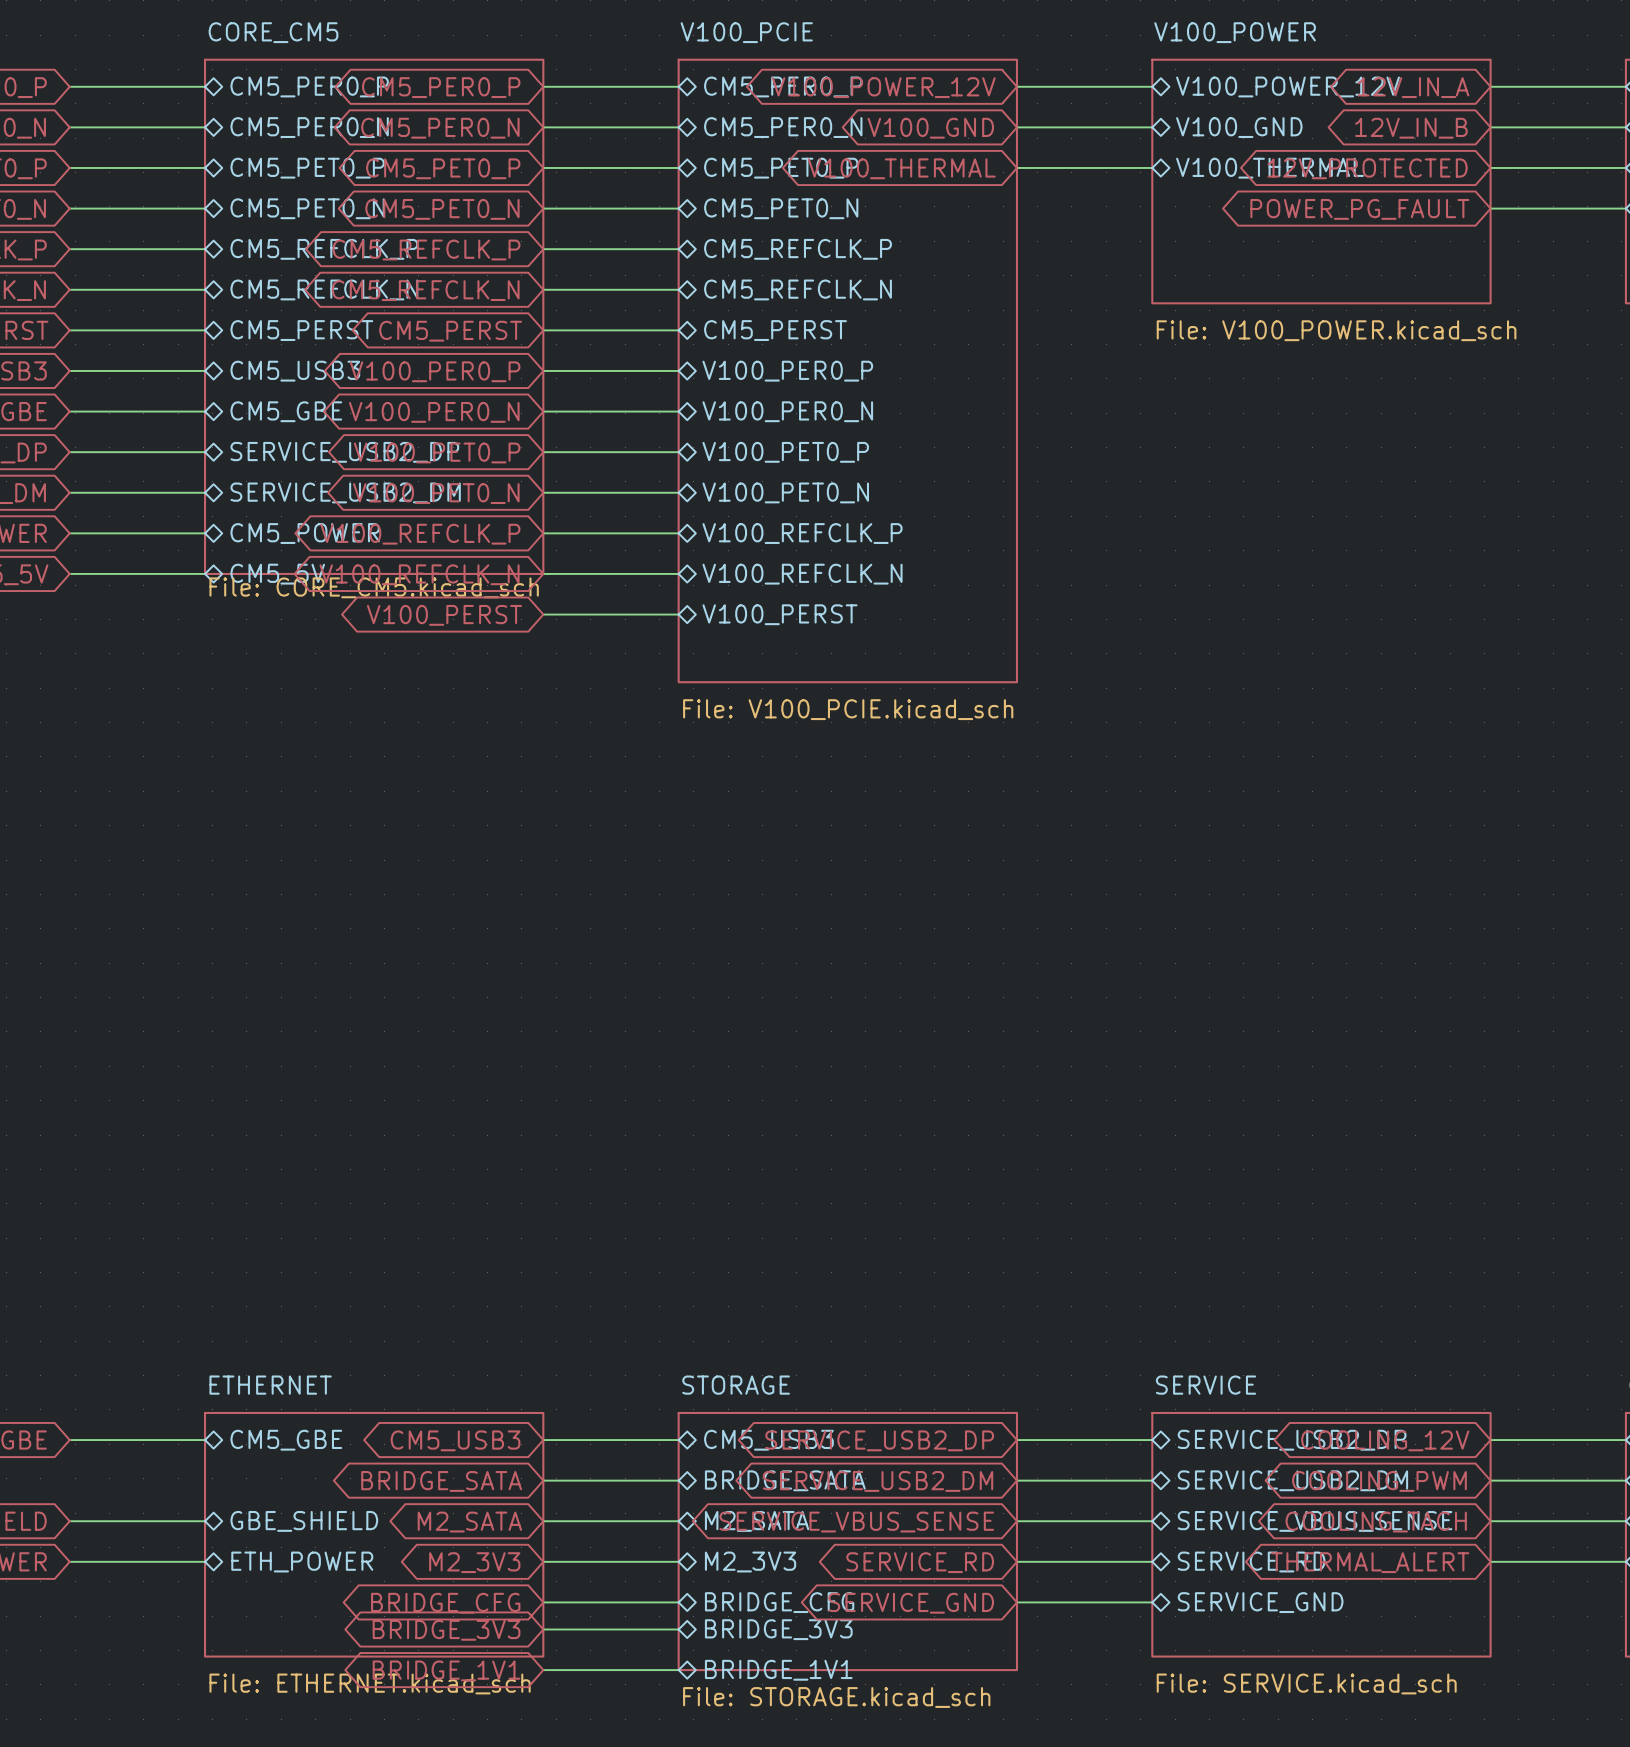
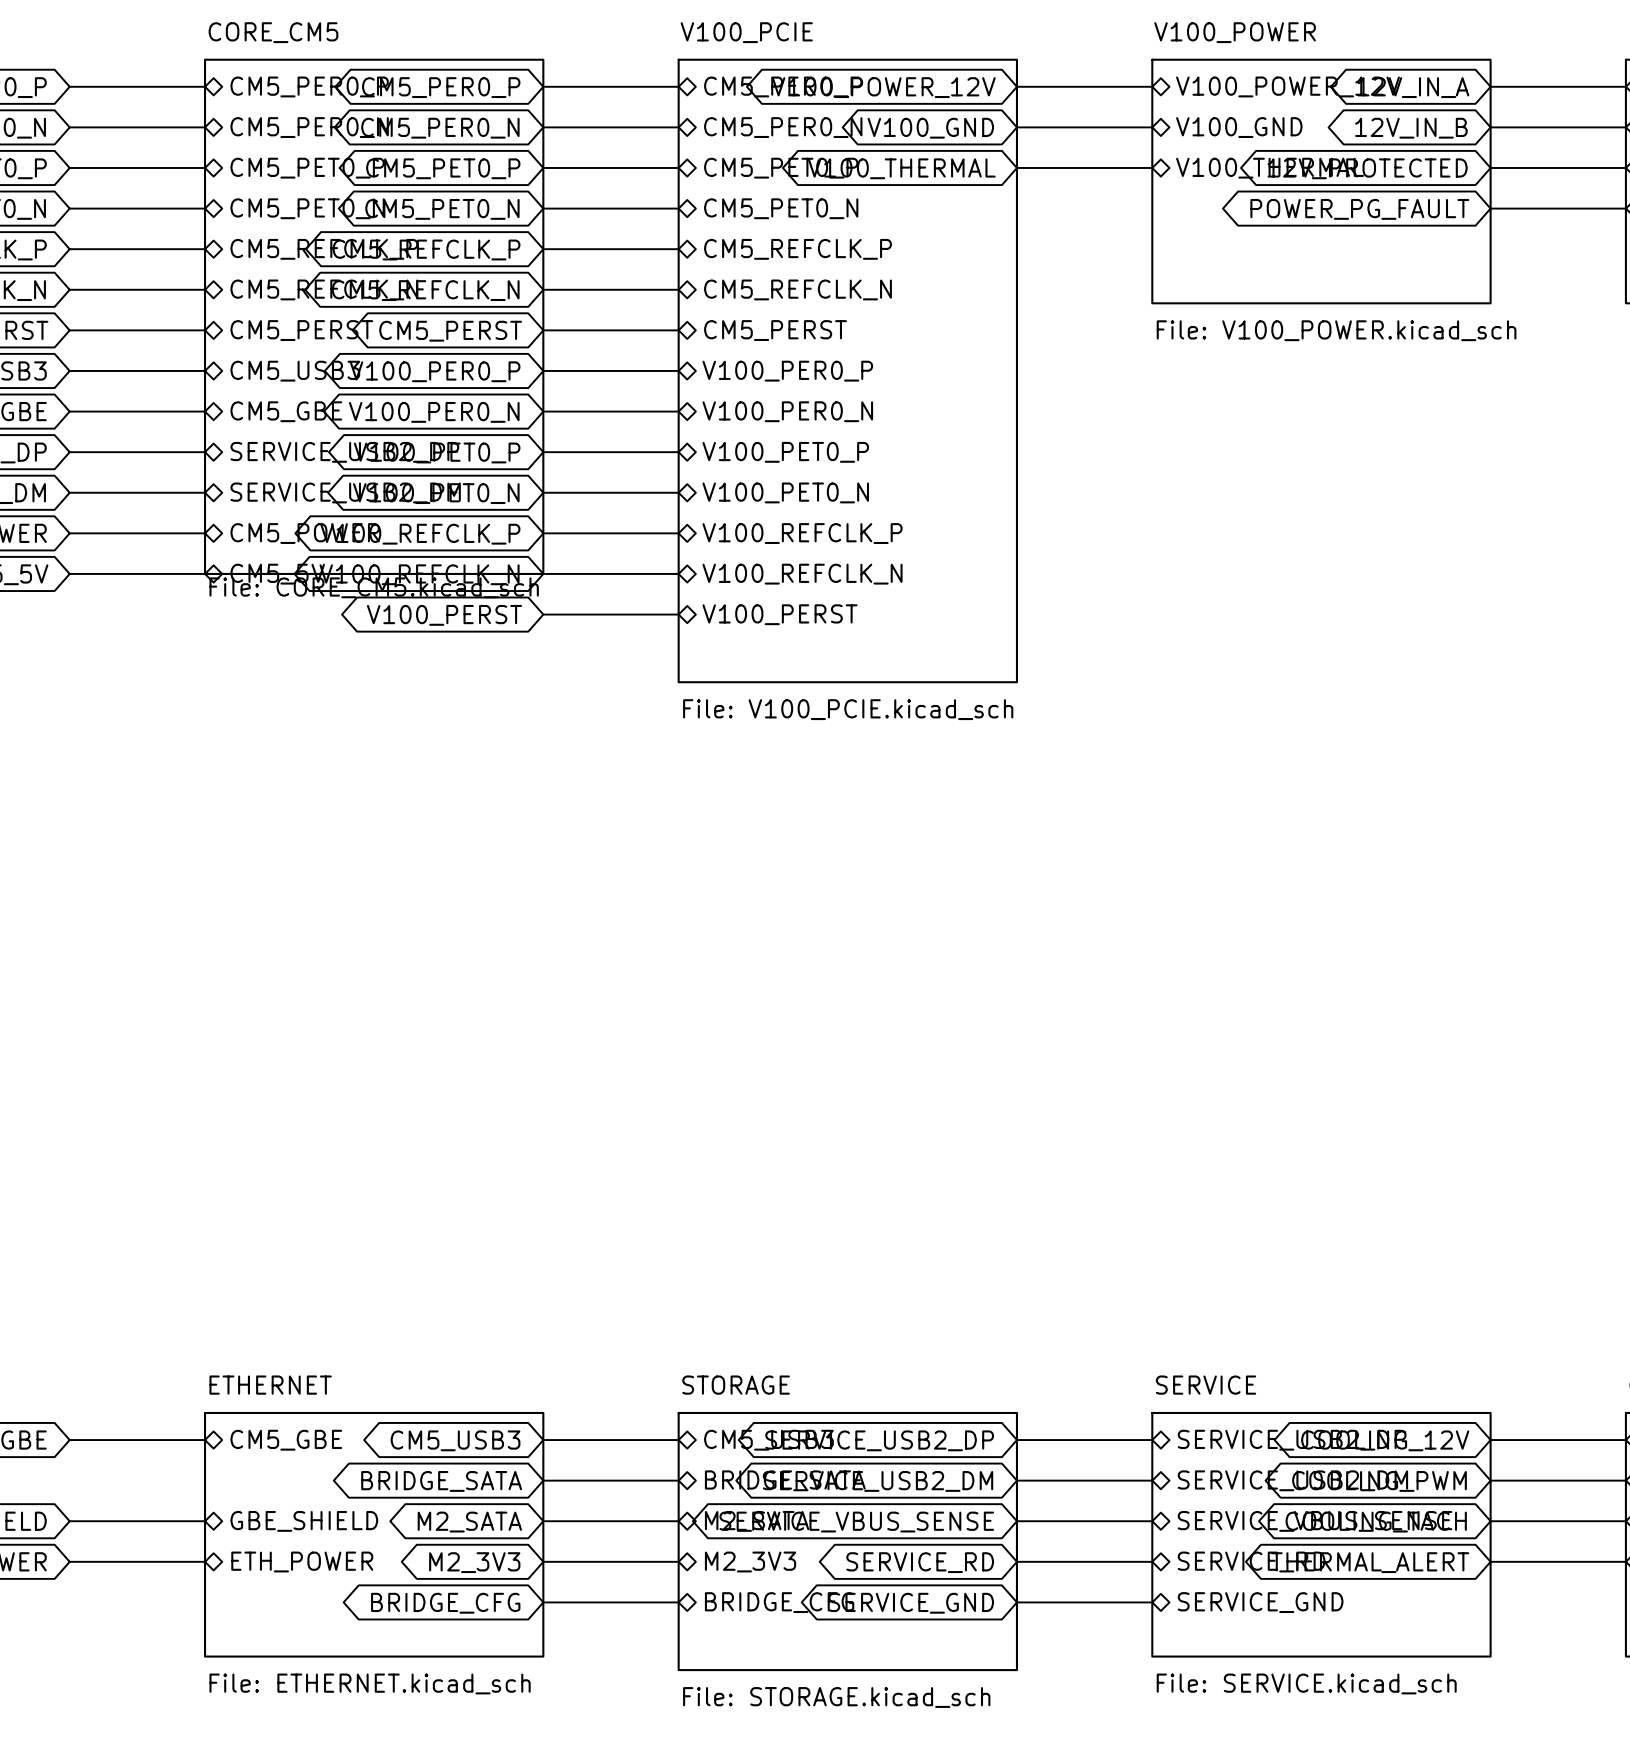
wire: (543, 1629) (678, 1629) -> none
sheet pin: BRIDGE_3V3 (778, 1629) -> none
global label: BRIDGE_3V3 (446, 1630) -> none
global label: BRIDGE_1V1 (446, 1670) -> none
wire: (543, 1670) (678, 1670) -> none
sheet pin: BRIDGE_1V1 (778, 1670) -> none

